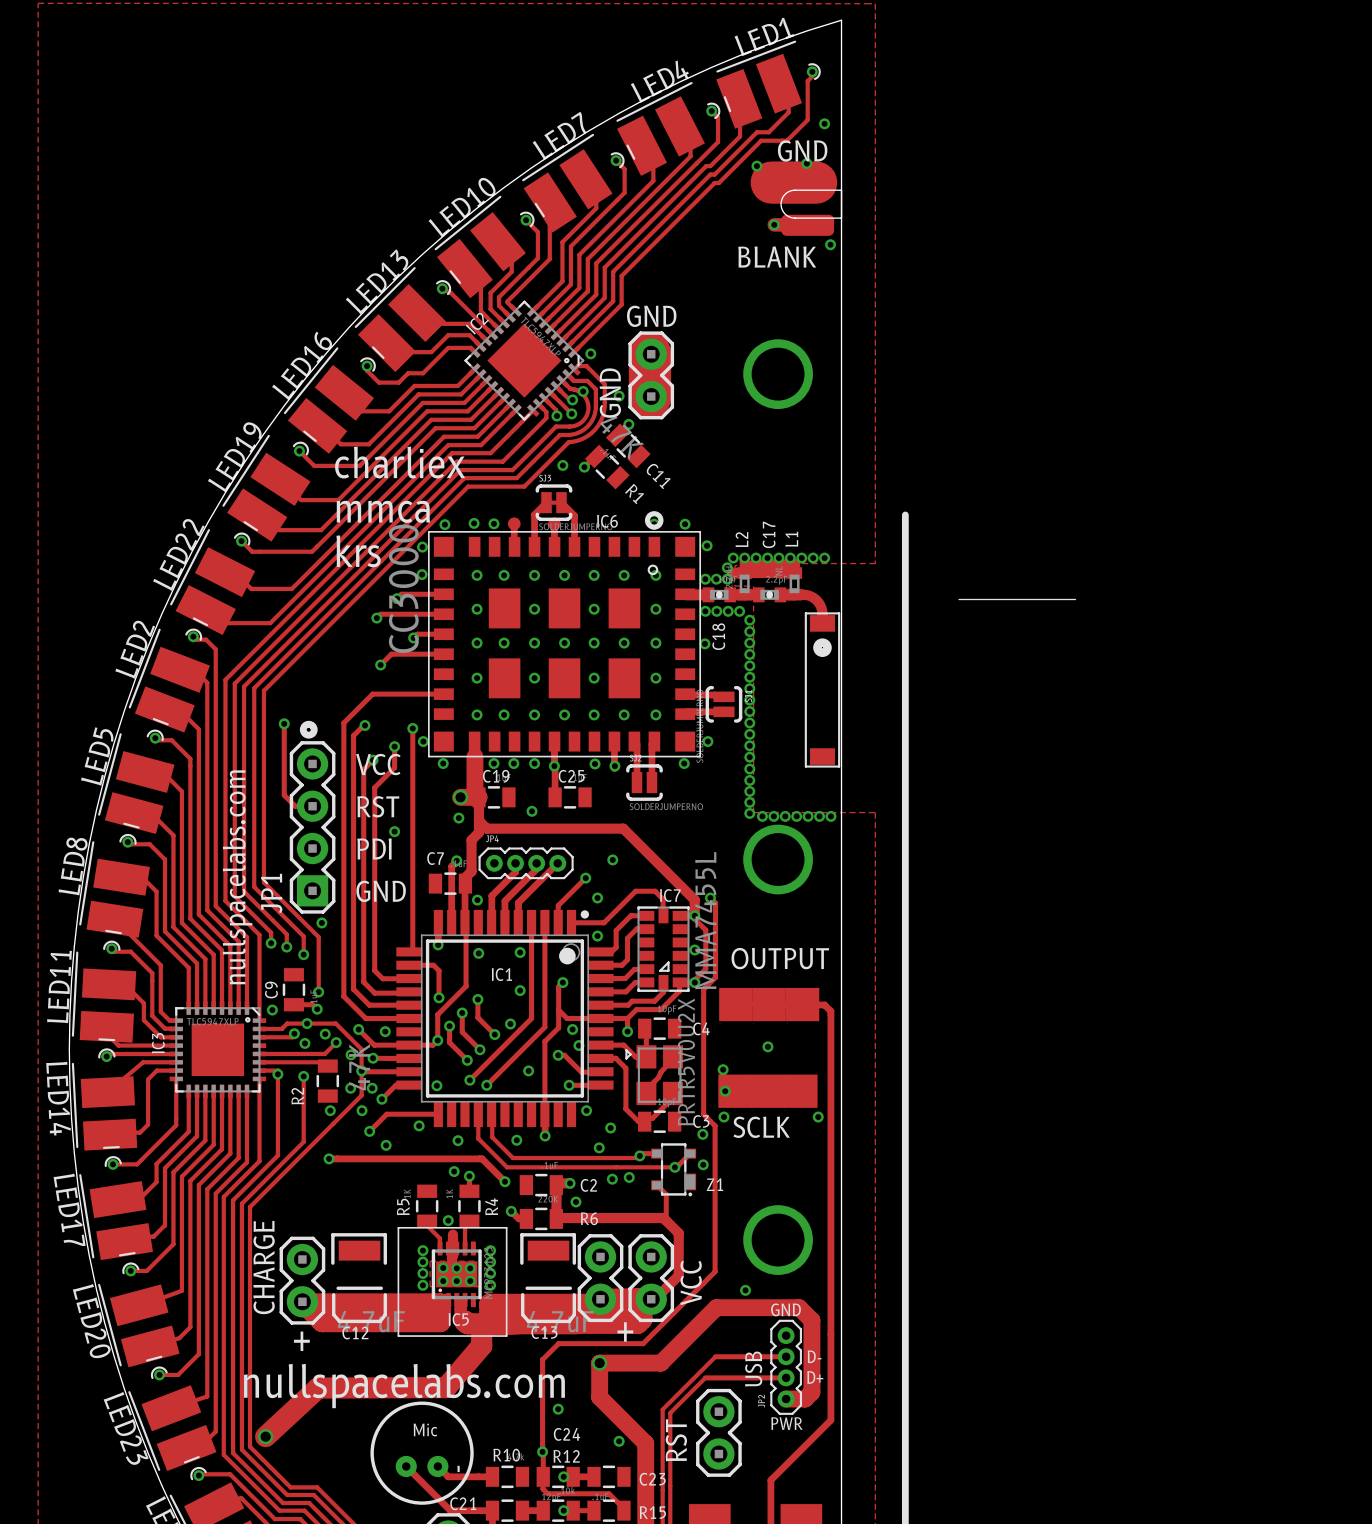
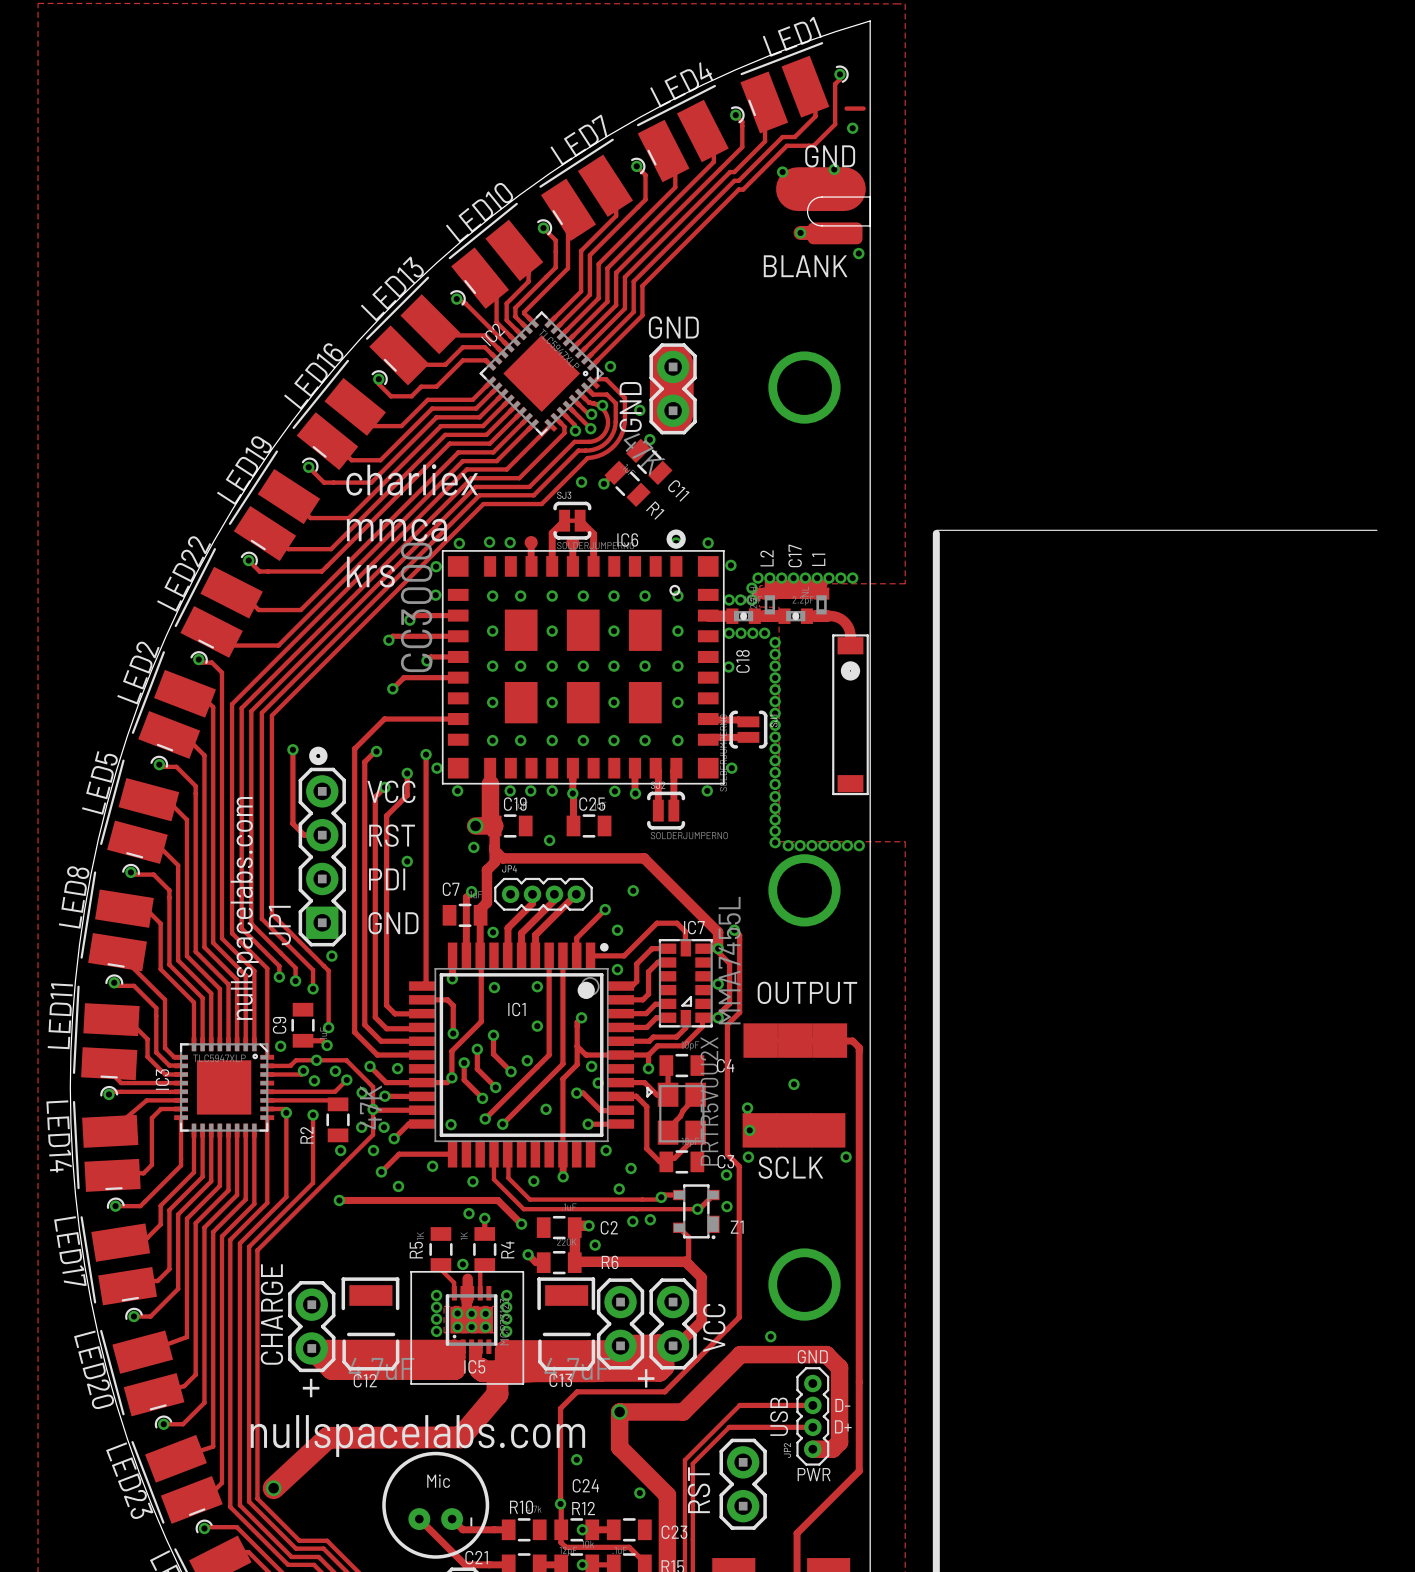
track: none -> (846, 108) (863, 108)
line: none -> (936, 530) (1376, 530)
line: (959, 599) (1075, 599) -> none

